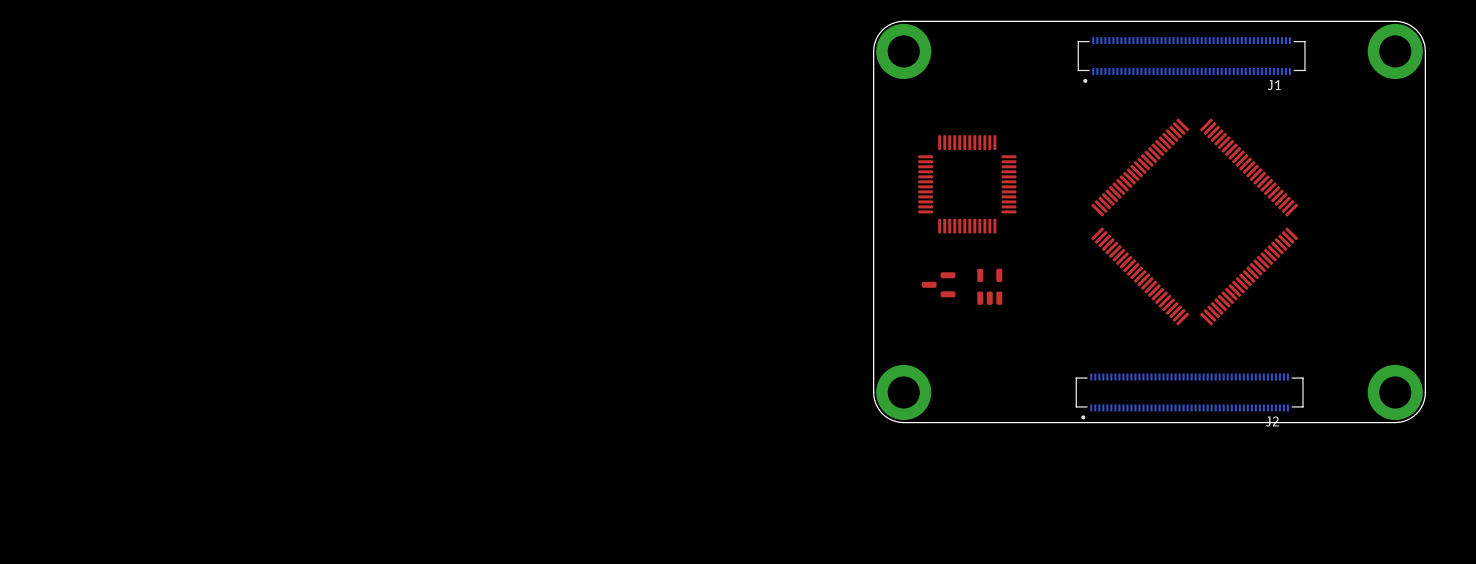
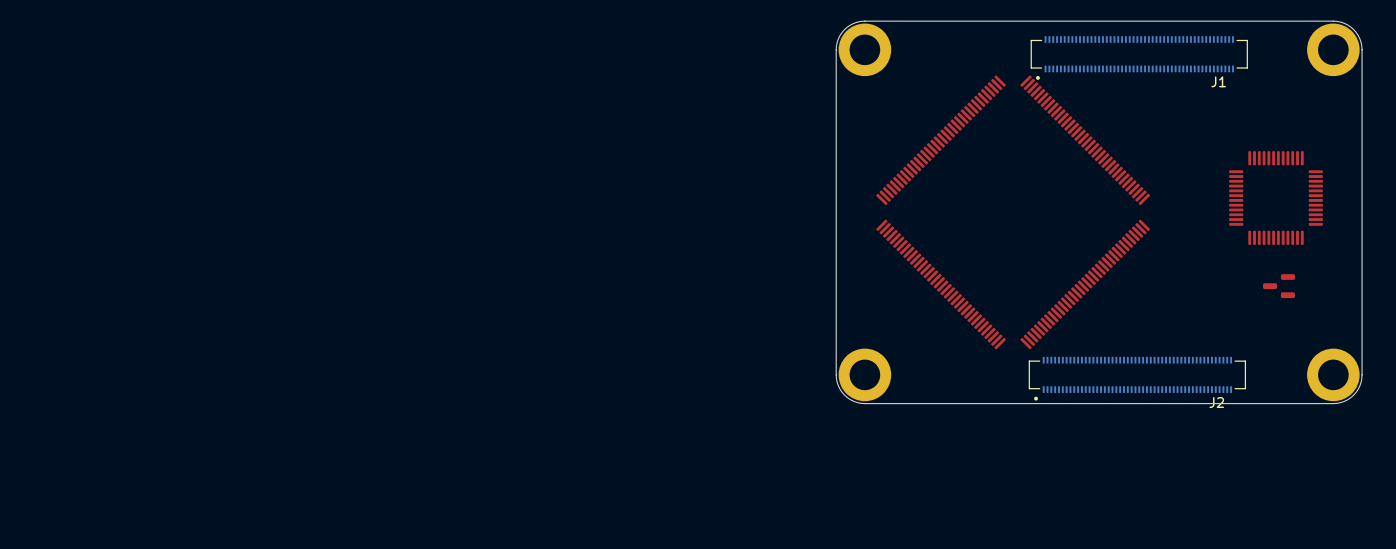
part: (967, 184) -> none
part: none -> (1276, 198)
part: none -> (1013, 212)
part: (1194, 221) -> none
part: (938, 284) -> none
part: (989, 286) -> none
part: none -> (1278, 286)

